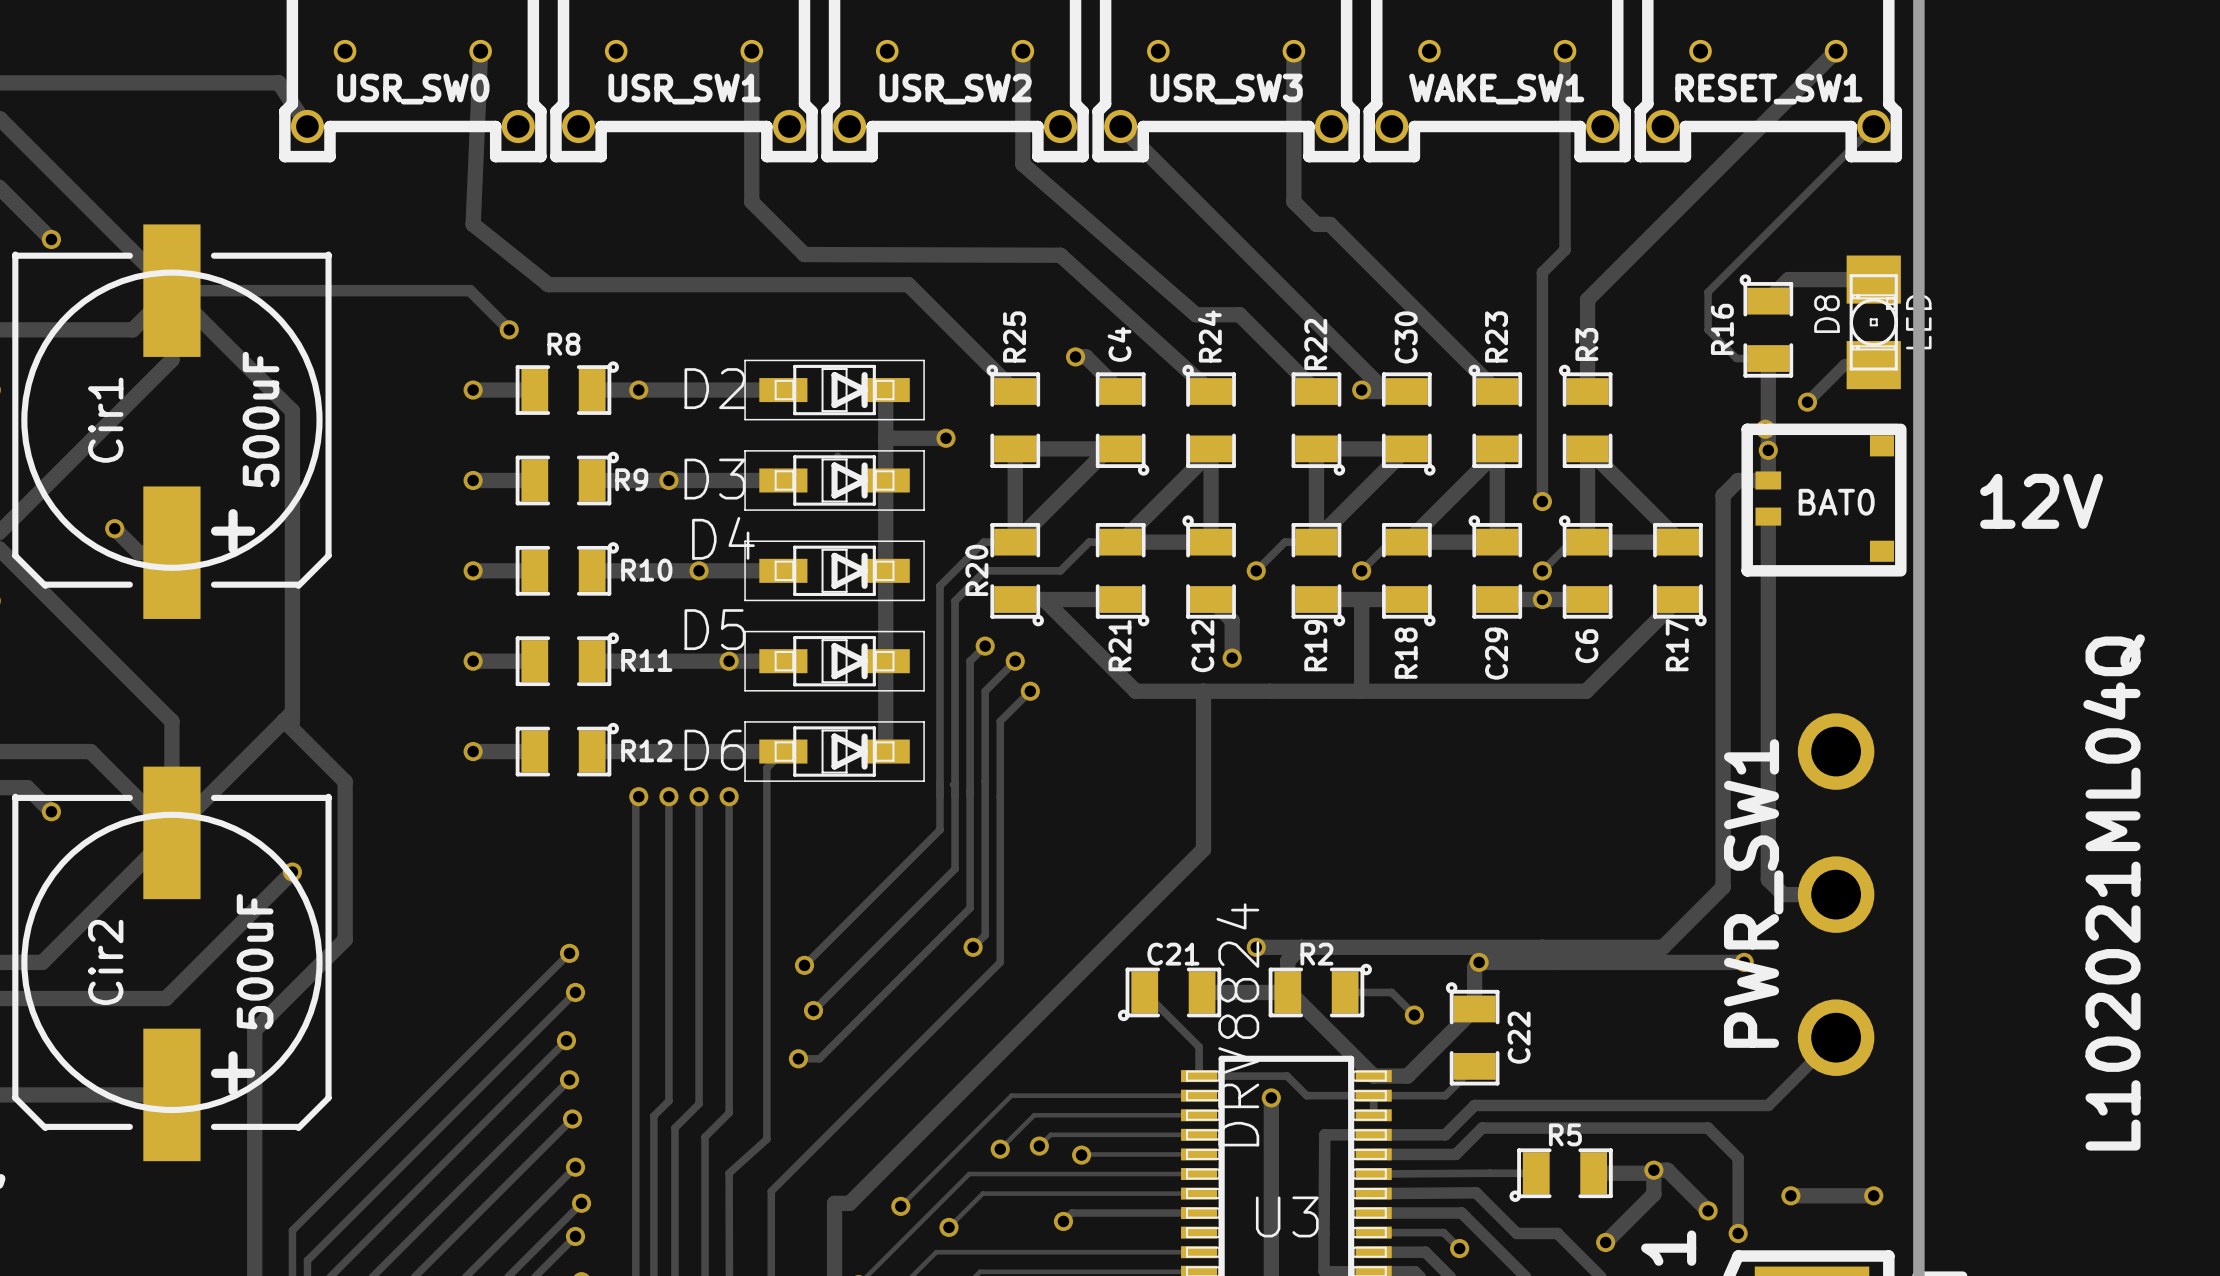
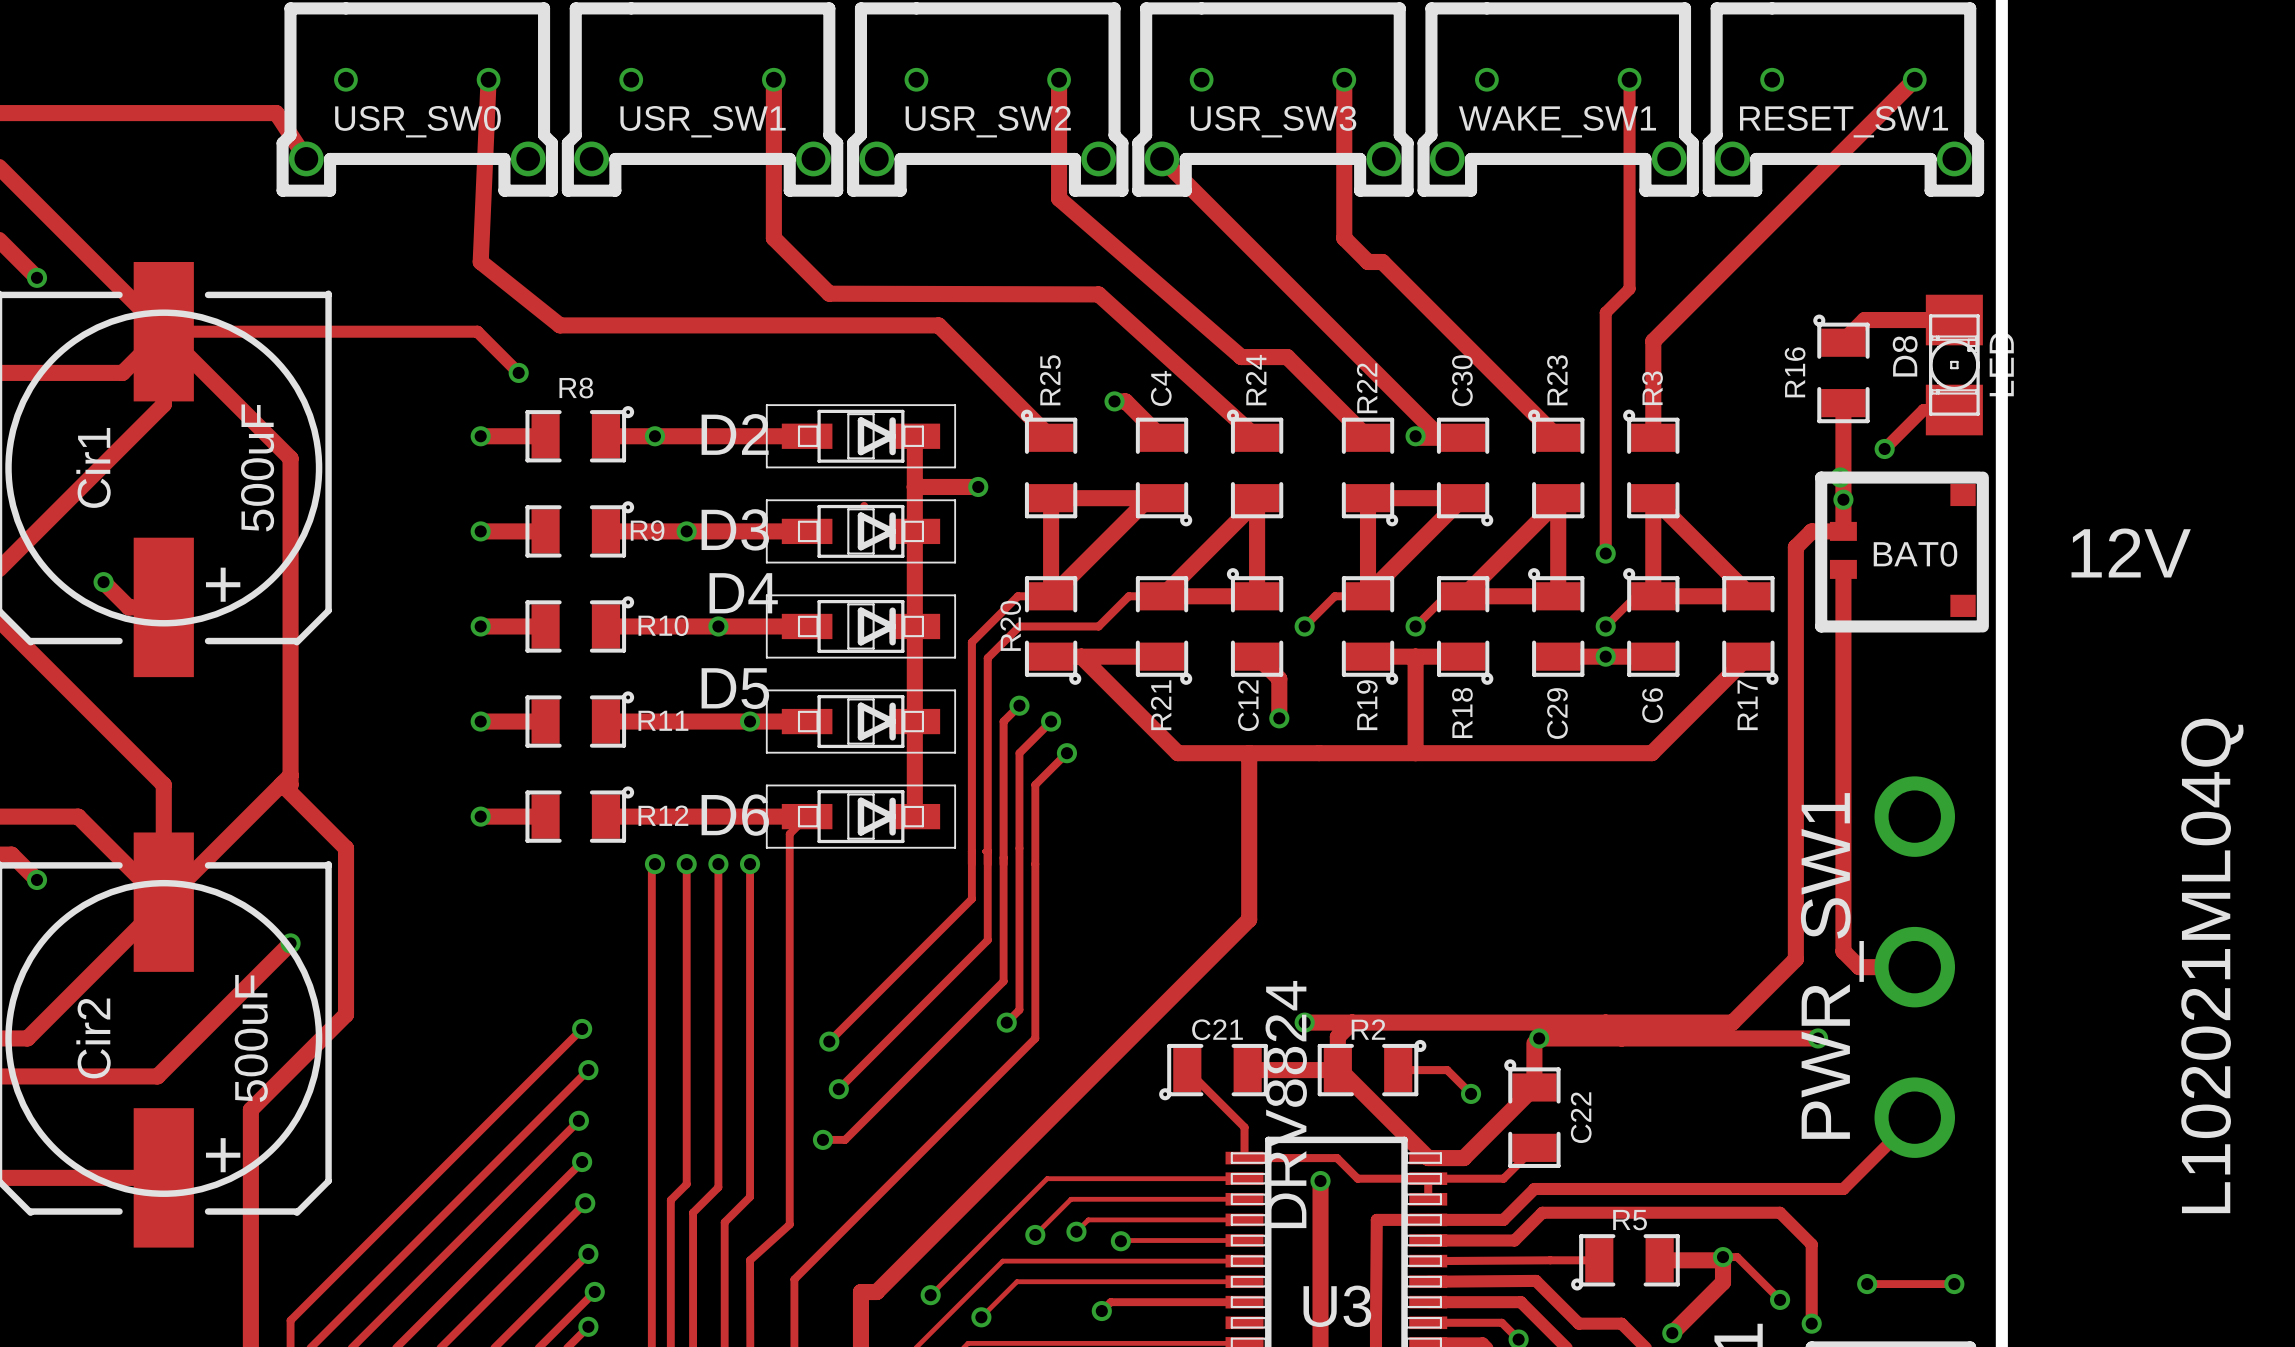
track: (1873, 126) (1708, 292) (1708, 329) (1736, 358) (1768, 358) -> none
track width: thick (1653, 1170) (1667, 1170) (1708, 1210) -> thin (1723, 1257) (1737, 1257) (1780, 1299)
track width: thick (1790, 1195) (1873, 1195) -> thin (1867, 1284) (1954, 1284)

